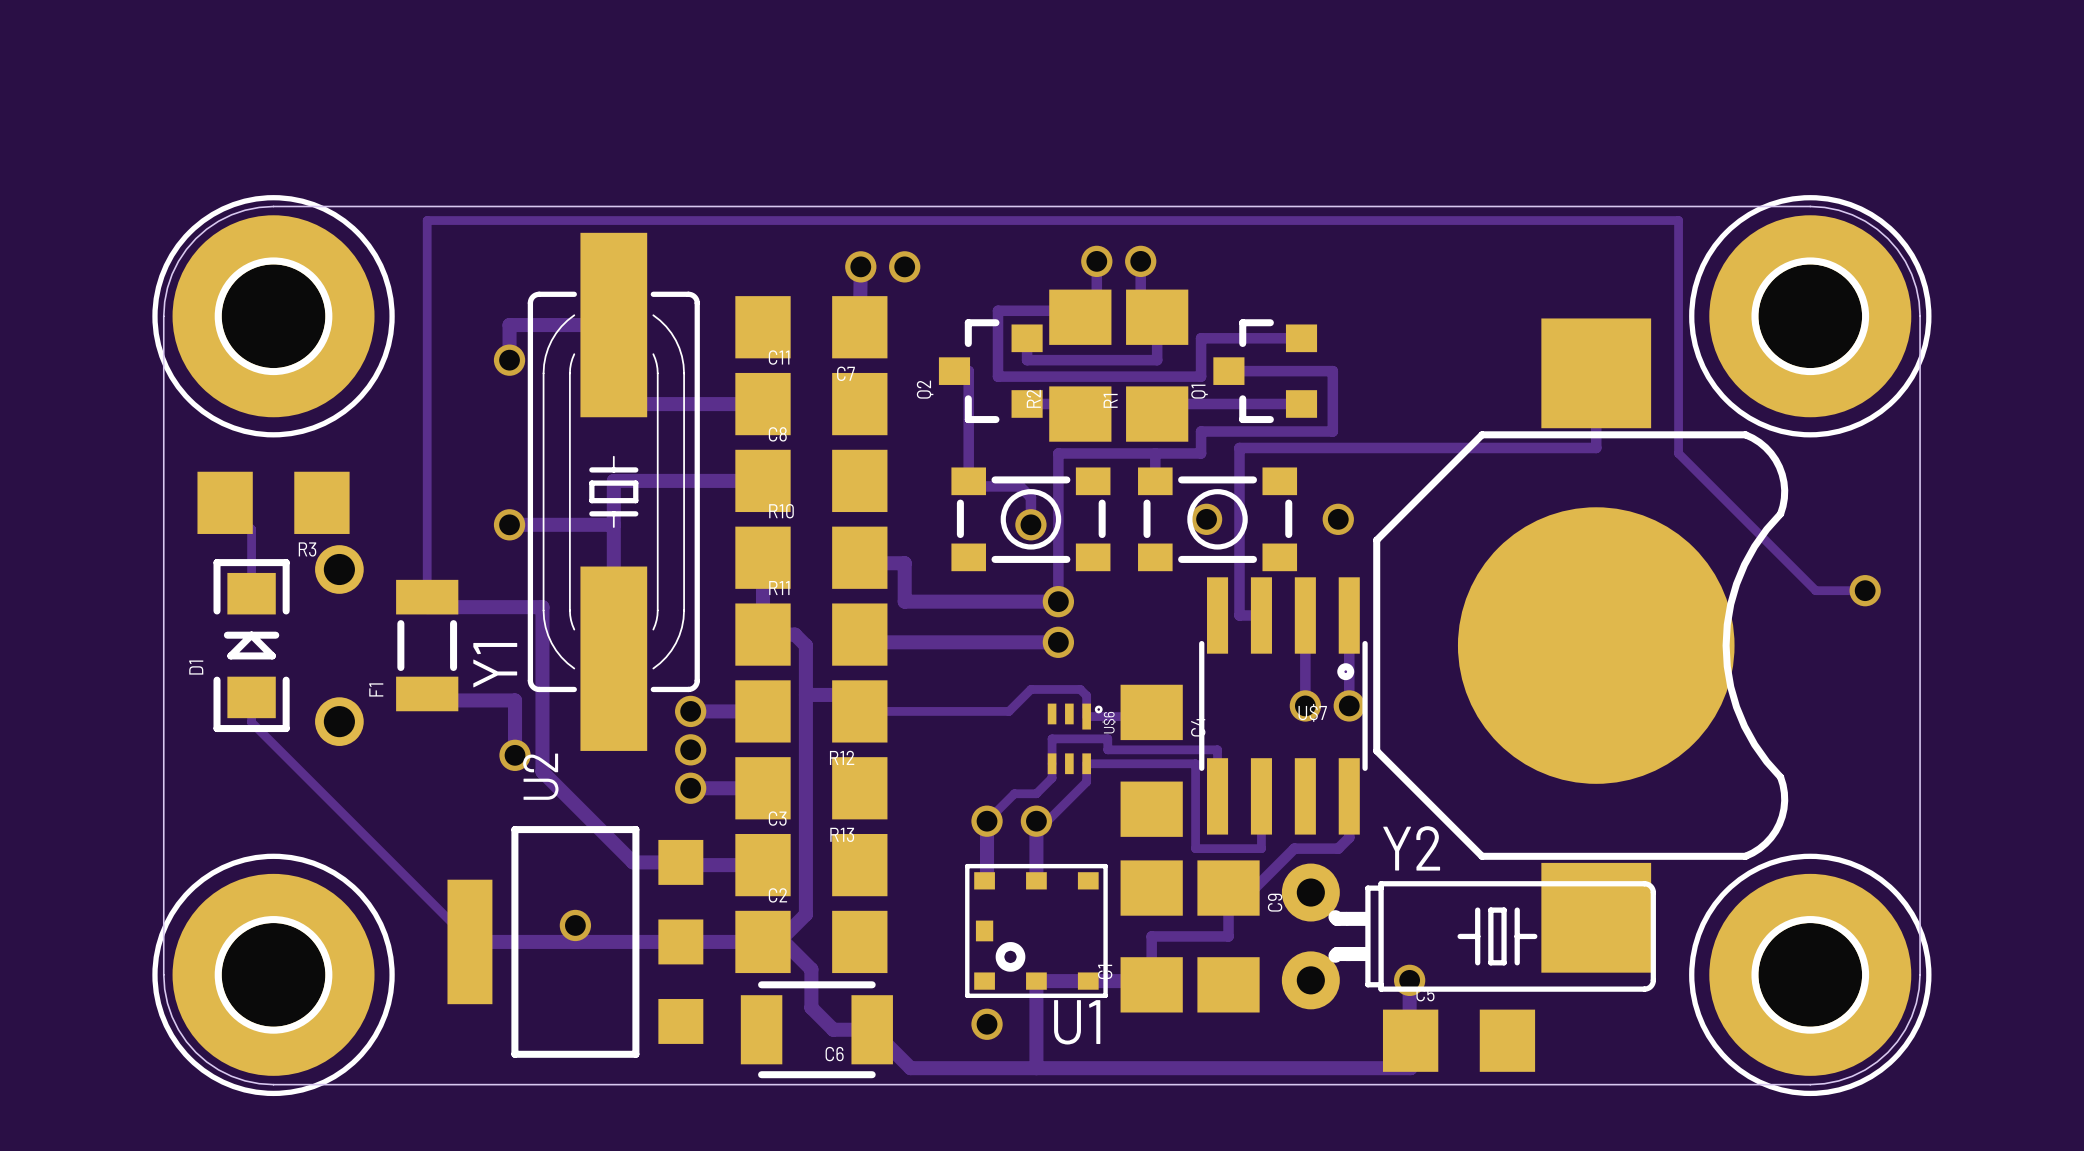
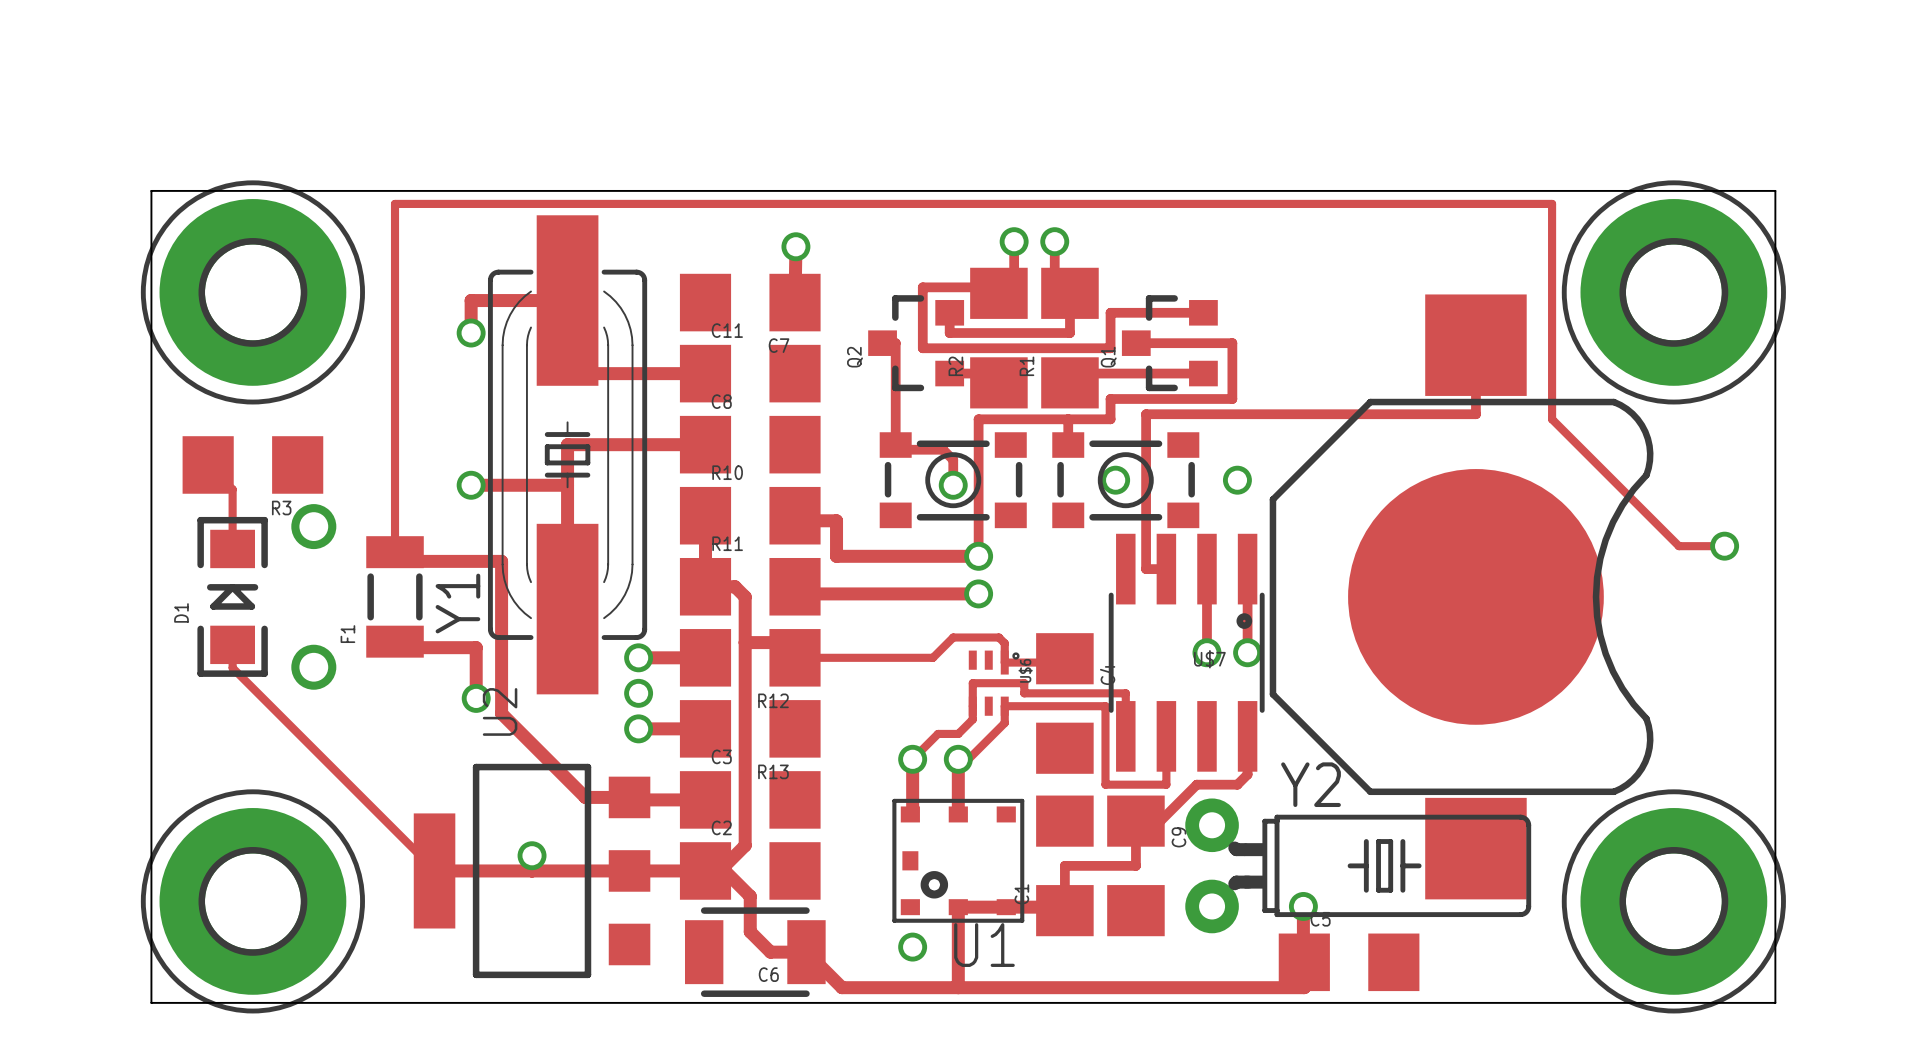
board edge: (273, 206) (245, 210) (231, 214) (218, 221) (195, 238) (178, 261) (172, 274) (167, 287) (163, 316) -> (252, 190) (151, 190) (151, 292)
board edge: (1810, 206) (1838, 210) (1852, 214) (1865, 221) (1887, 238) (1905, 261) (1911, 274) (1916, 287) (1920, 316) -> (1673, 190) (1775, 190) (1775, 292)
via: (904, 266) -> none
board edge: (163, 974) (167, 1003) (172, 1016) (178, 1029) (195, 1052) (218, 1069) (231, 1076) (245, 1080) (273, 1084) -> (151, 901) (151, 1002) (252, 1002)
board edge: (1920, 974) (1916, 1003) (1911, 1016) (1905, 1029) (1887, 1052) (1865, 1069) (1852, 1076) (1838, 1080) (1810, 1084) -> (1775, 901) (1775, 1002) (1673, 1002)

